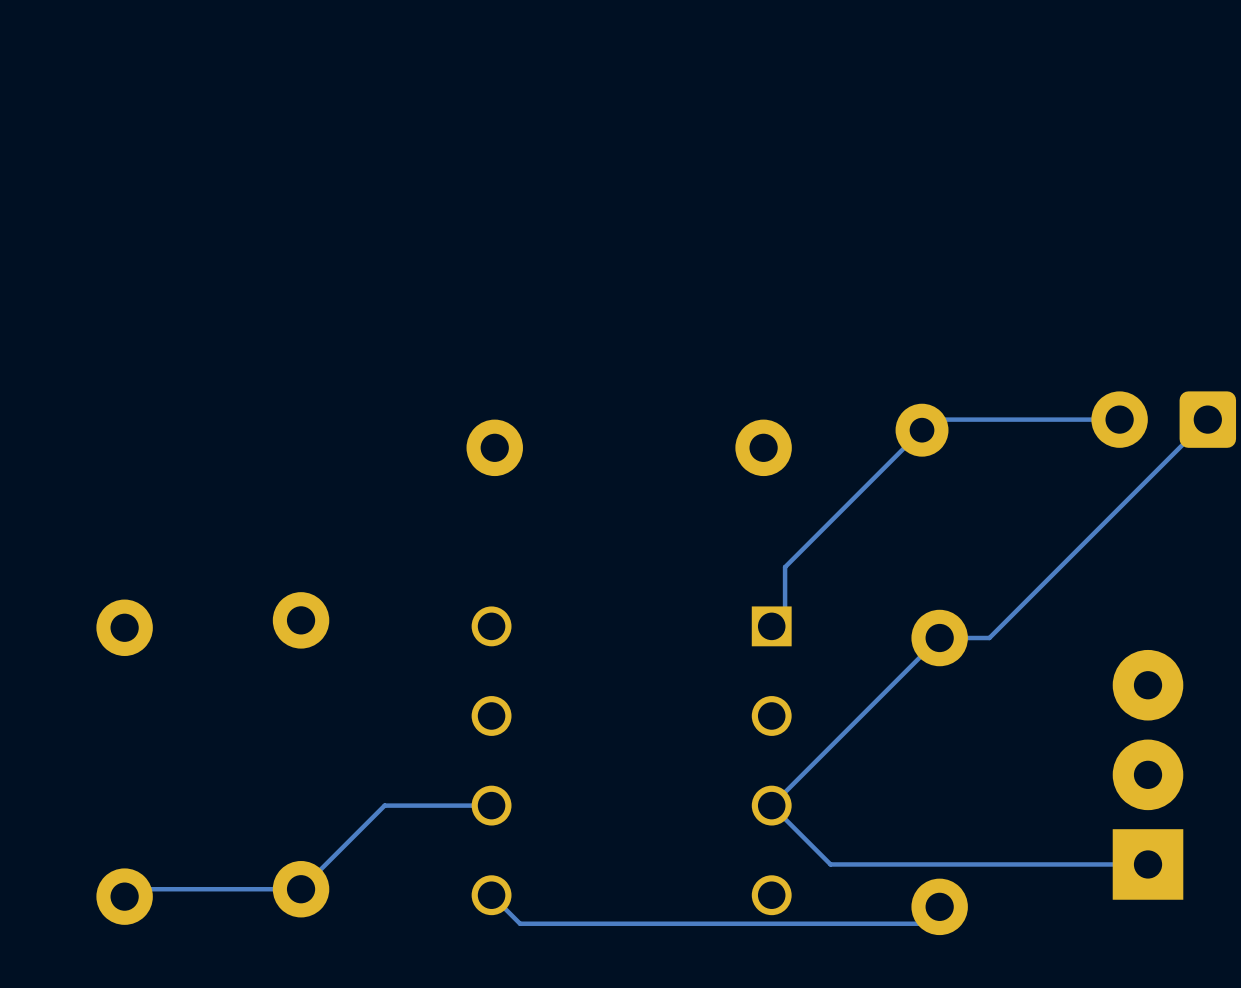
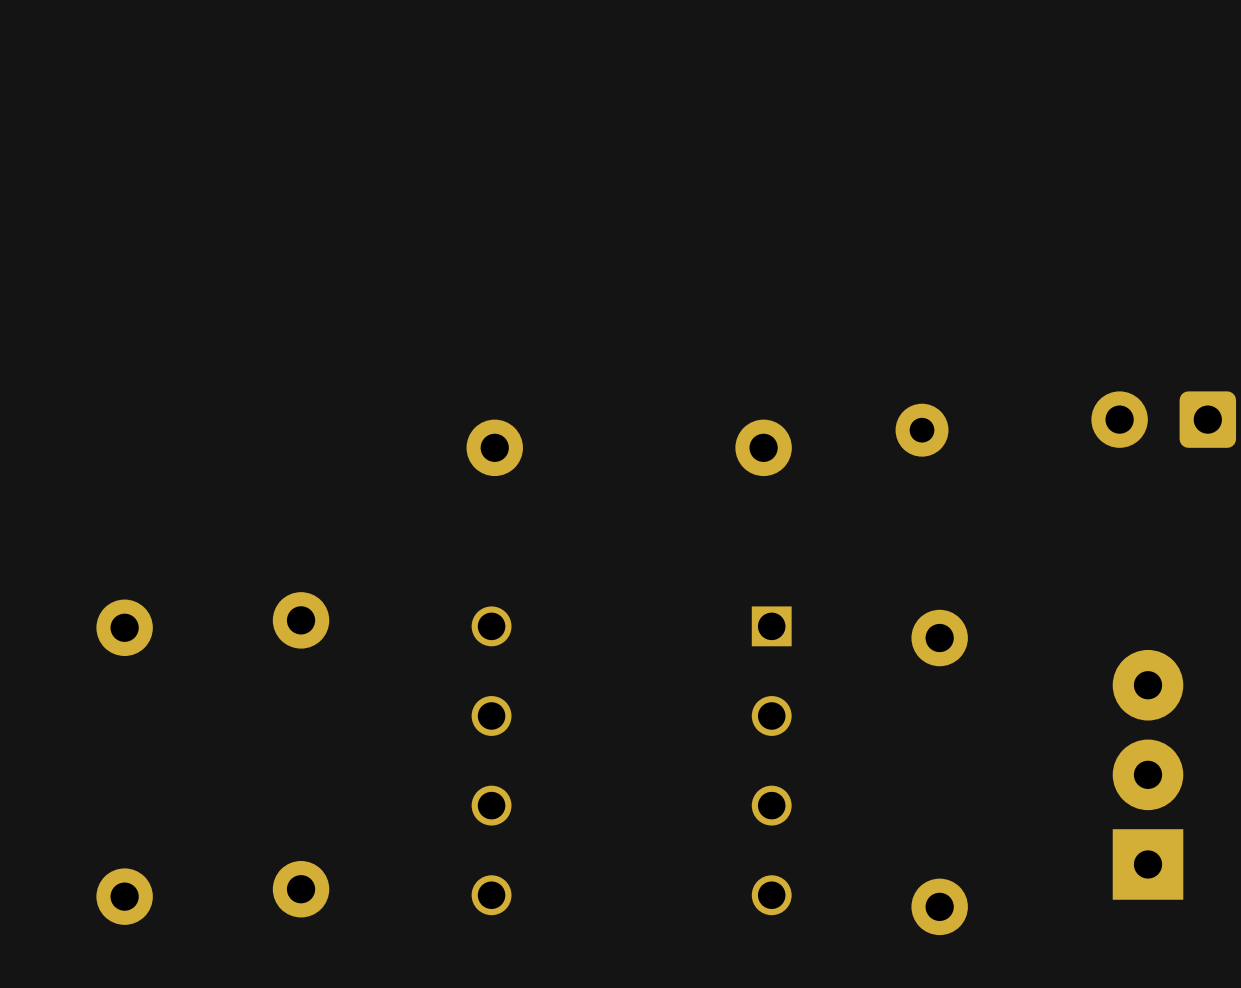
track: (1119, 419) (932, 419) -> none
track: (1207, 419) (989, 638) (939, 638) -> none
track: (922, 430) (785, 567) (785, 626) (771, 626) -> none
track: (939, 638) (771, 805) (830, 864) (1148, 864) -> none
track: (491, 805) (384, 805) (301, 889) (132, 889) -> none
track: (491, 895) (520, 923) (922, 923) (939, 906) -> none

